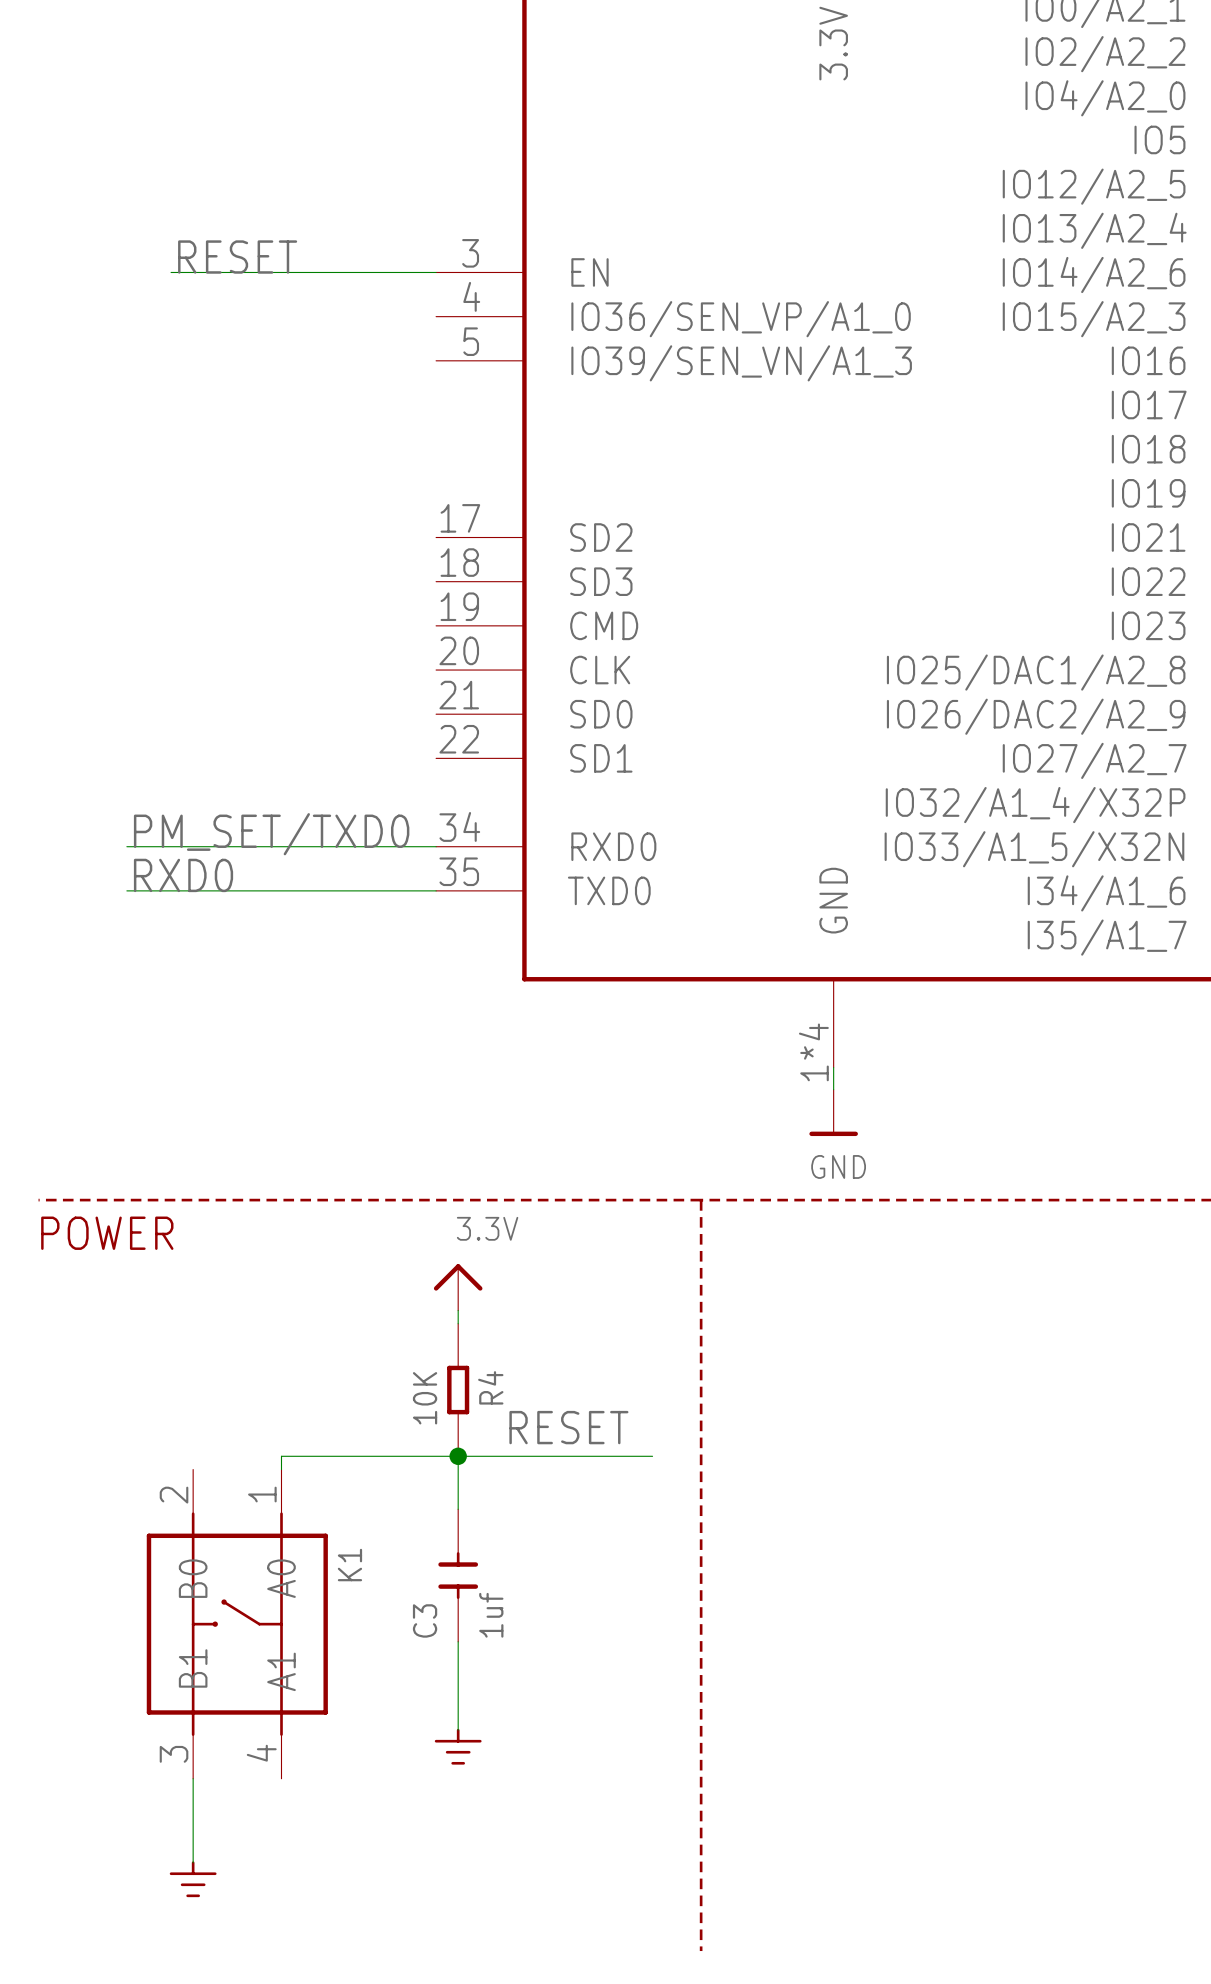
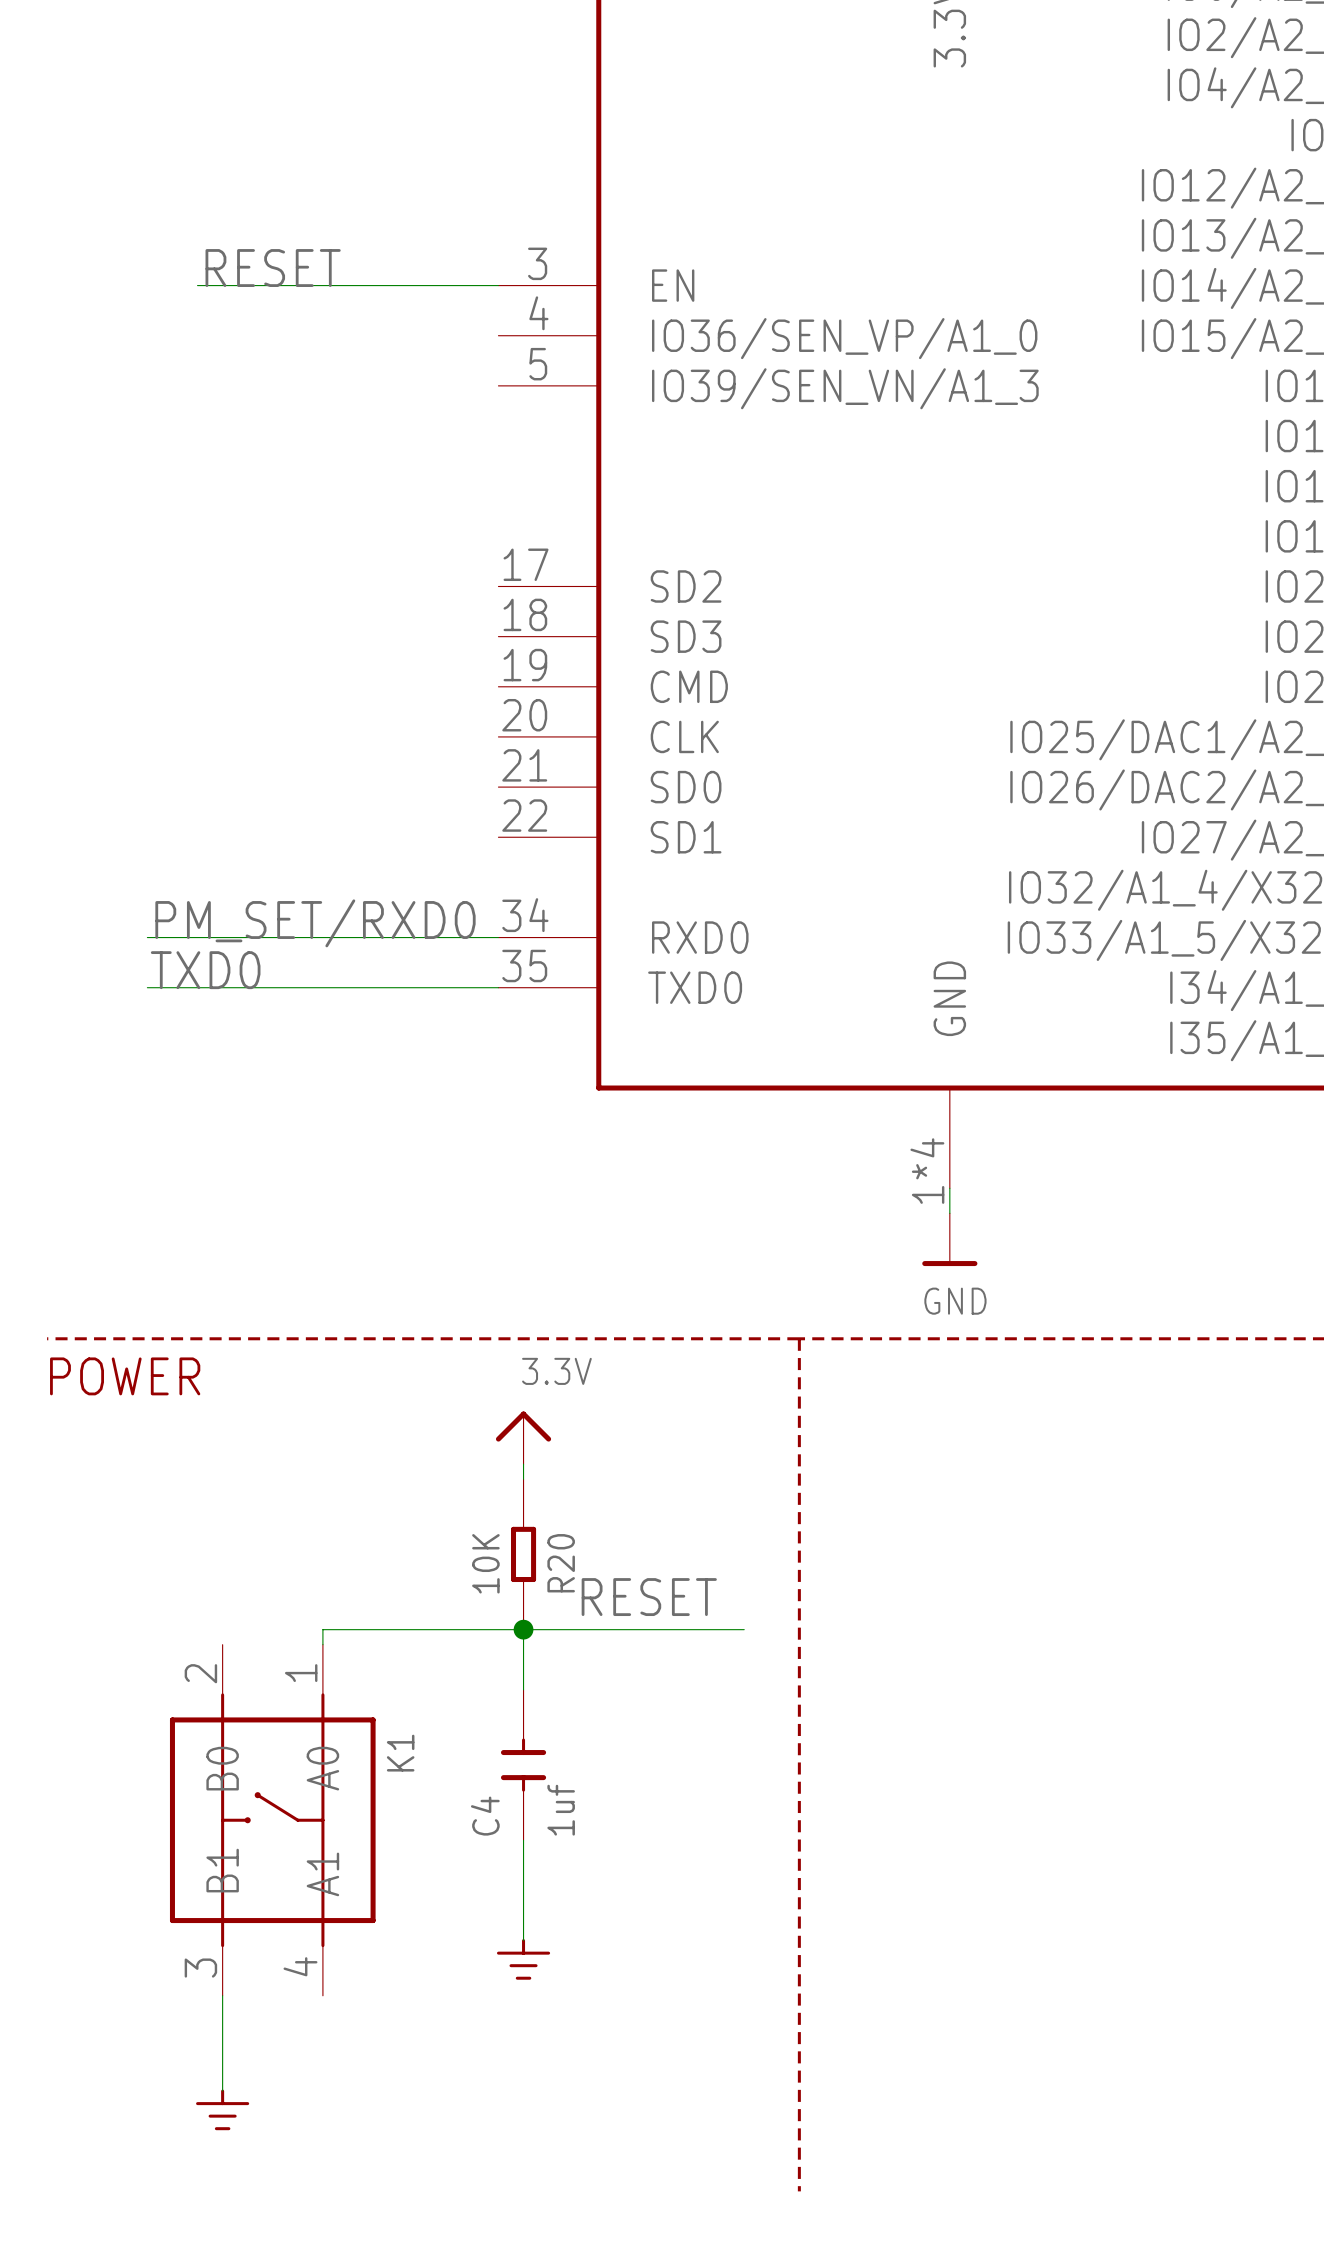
label: PM_SET/TXD0 (271, 834) -> PM_SET/RXD0 (315, 923)
label: RXD0 (183, 875) -> TXD0 (205, 970)
R4 name: R4 (490, 1387) -> R20 (561, 1563)
C3 name: C3 (425, 1620) -> C4 (485, 1816)

